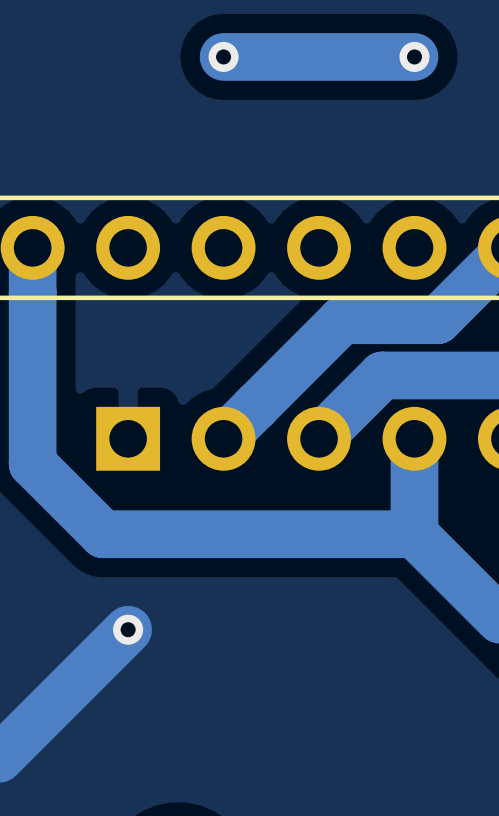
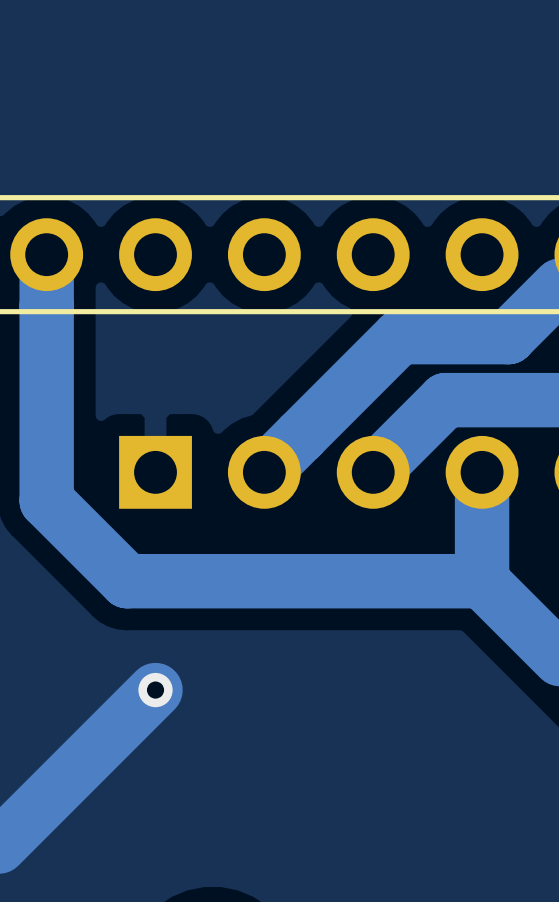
via: (223, 56) -> none
track: (414, 56) (223, 56) -> none
via: (414, 56) -> none

